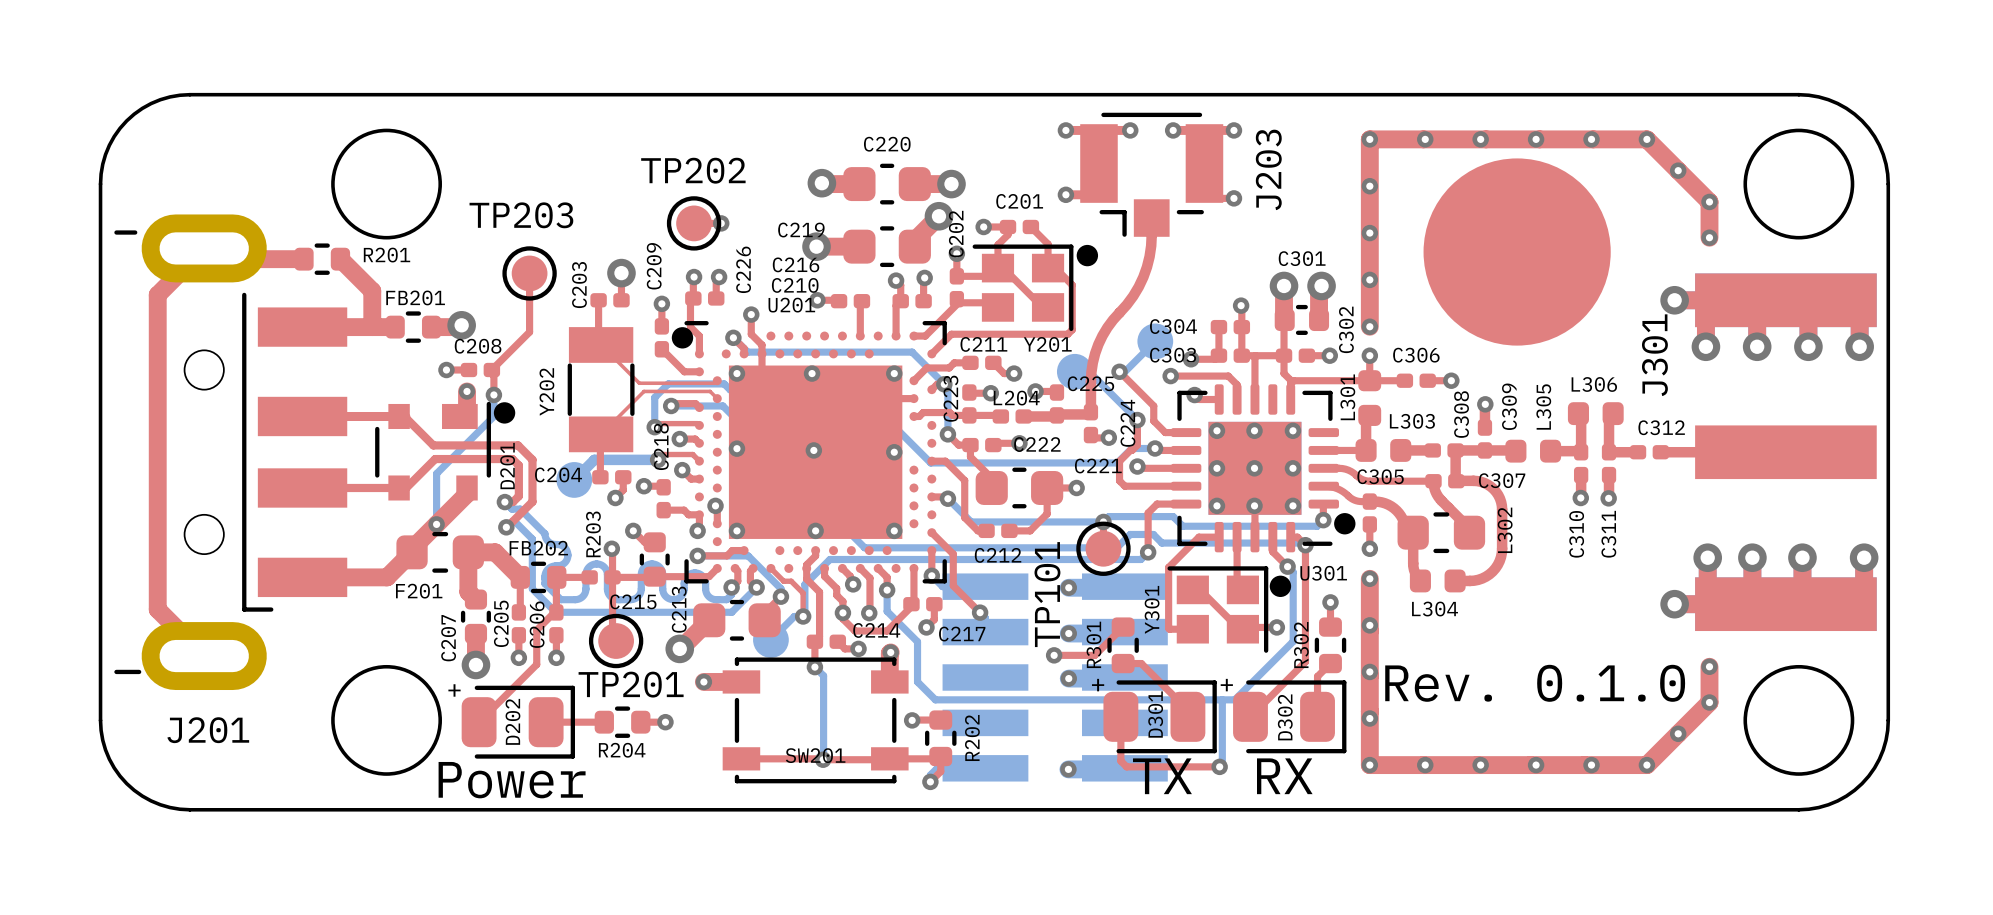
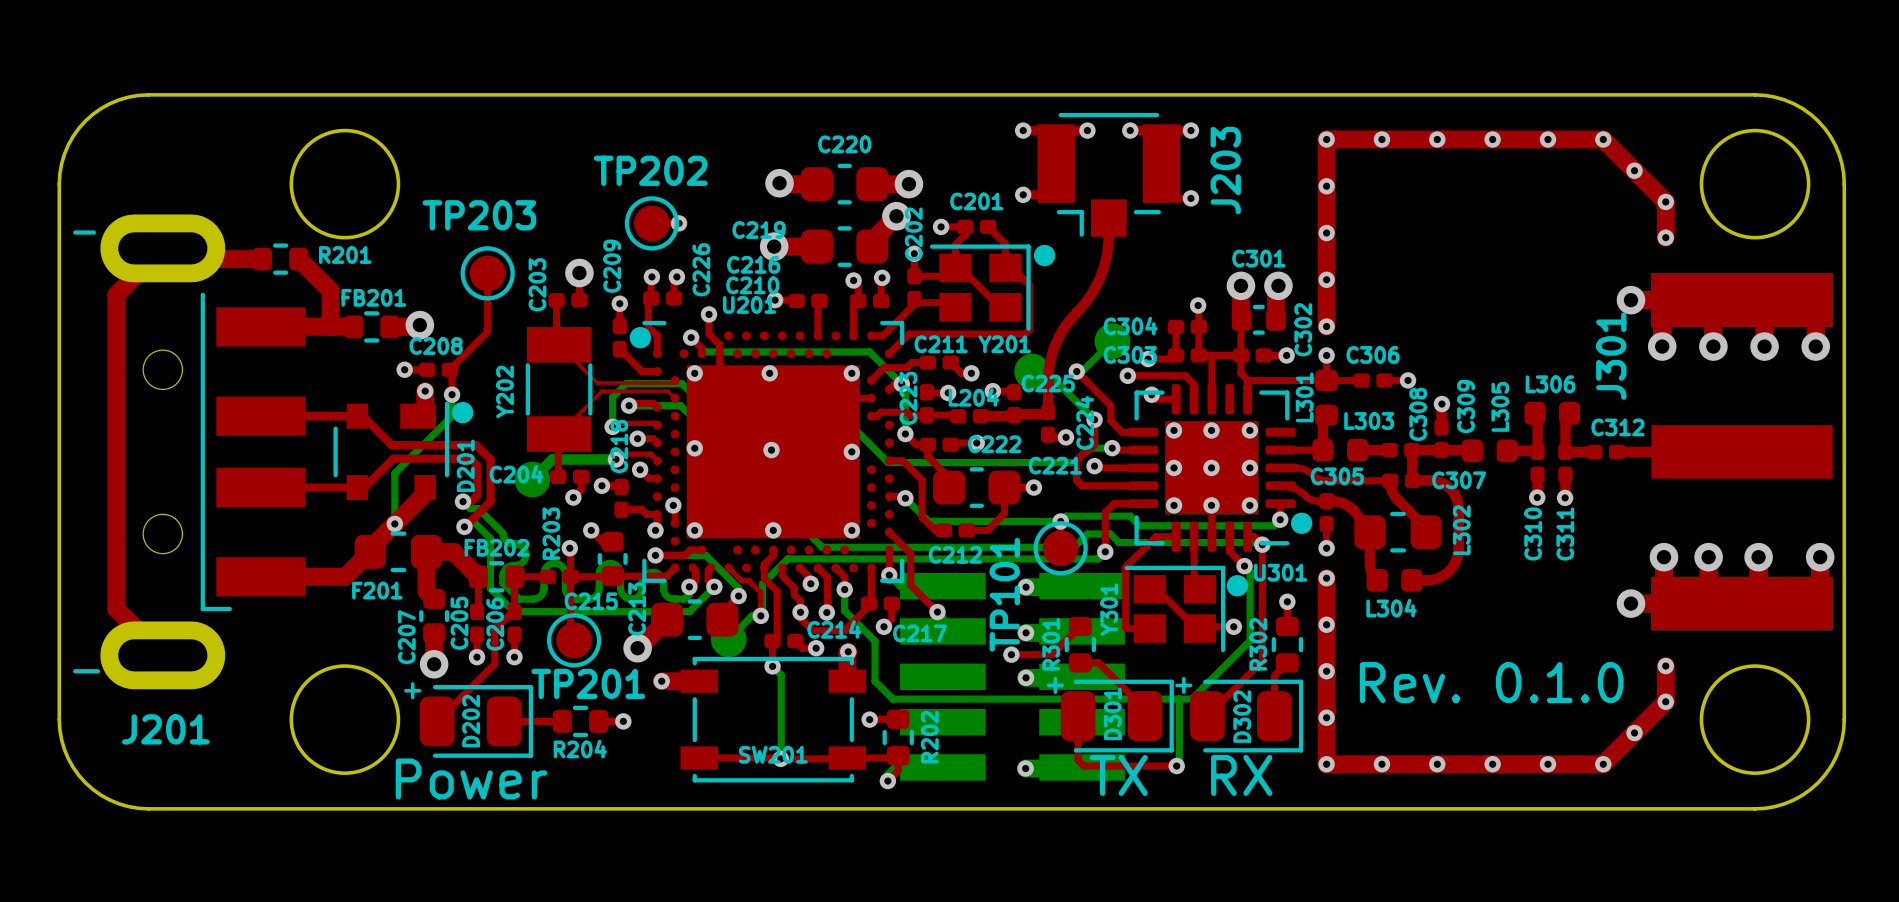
drawing: [1423, 158, 1611, 346] -> none

